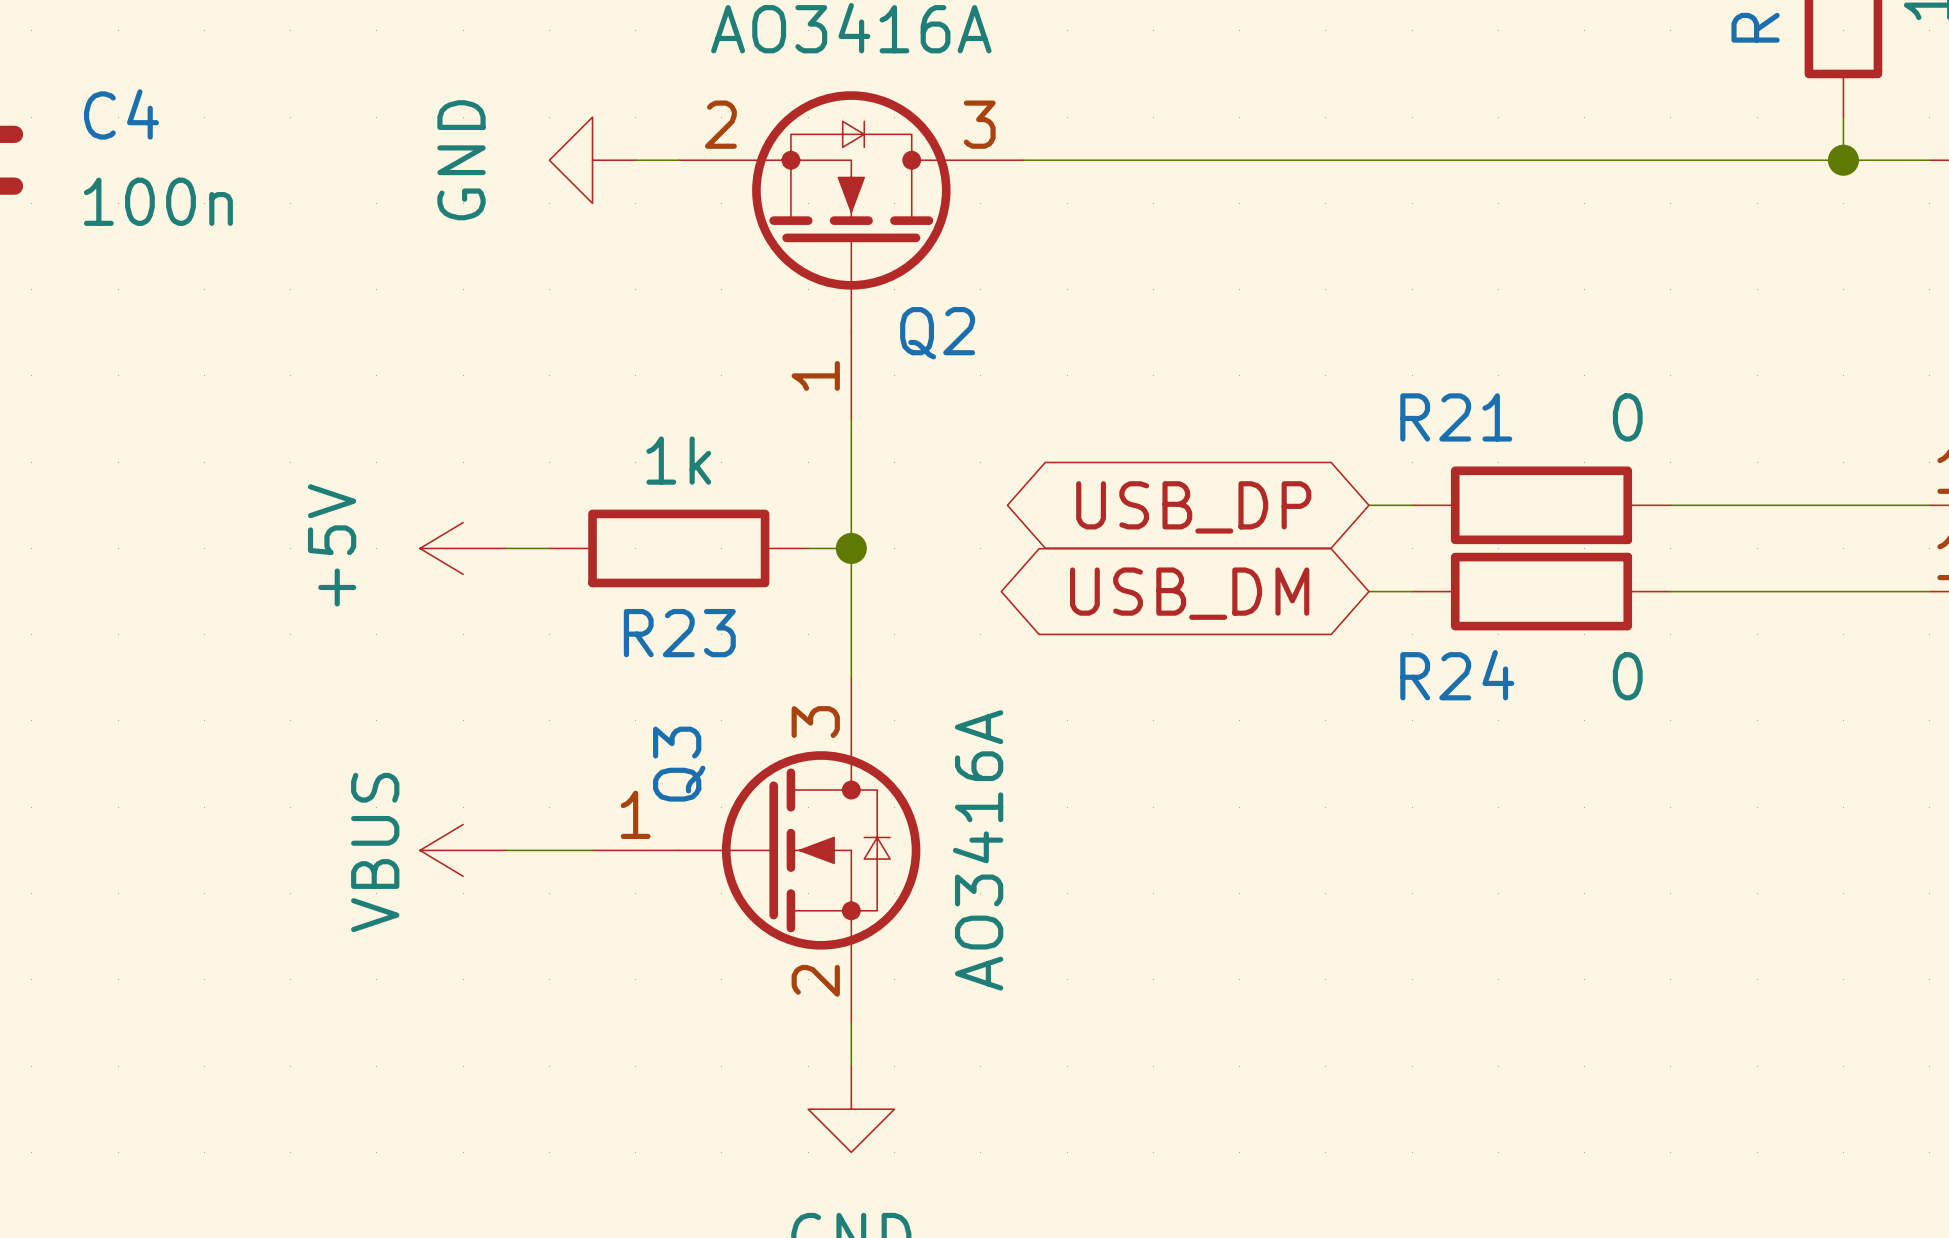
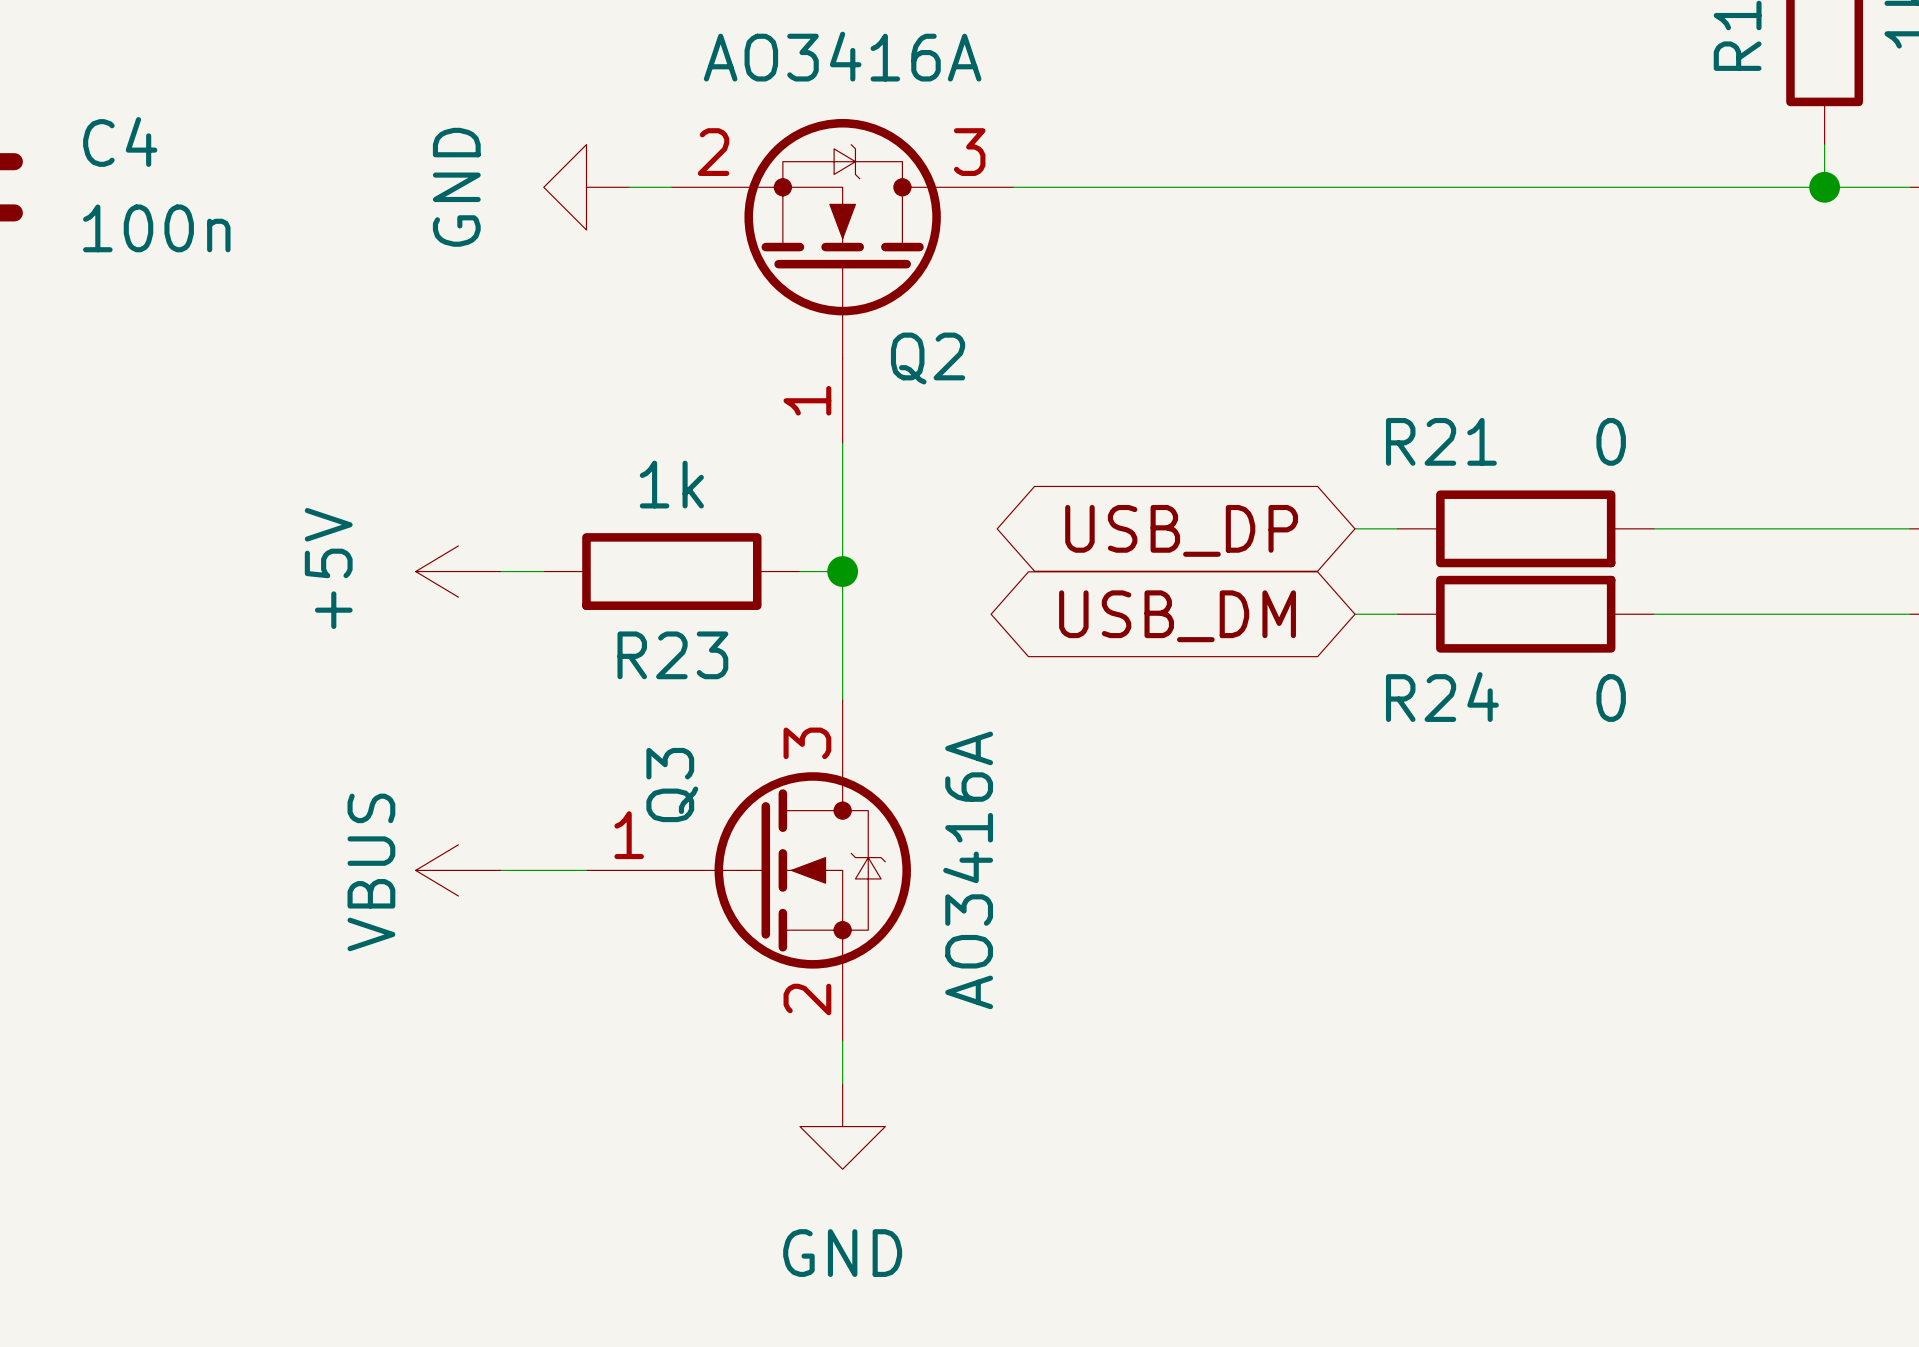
Q2 symbol: [678, 91, 1024, 420] -> [671, 118, 1014, 444]
Q3 symbol: [592, 677, 921, 1023] -> [586, 699, 911, 1042]

